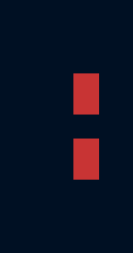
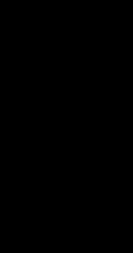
part: (86, 126) -> none

